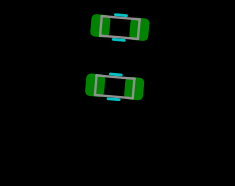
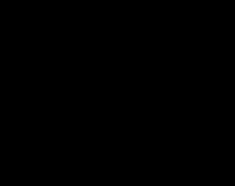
part: (119, 27) -> none
part: (114, 86) -> none

